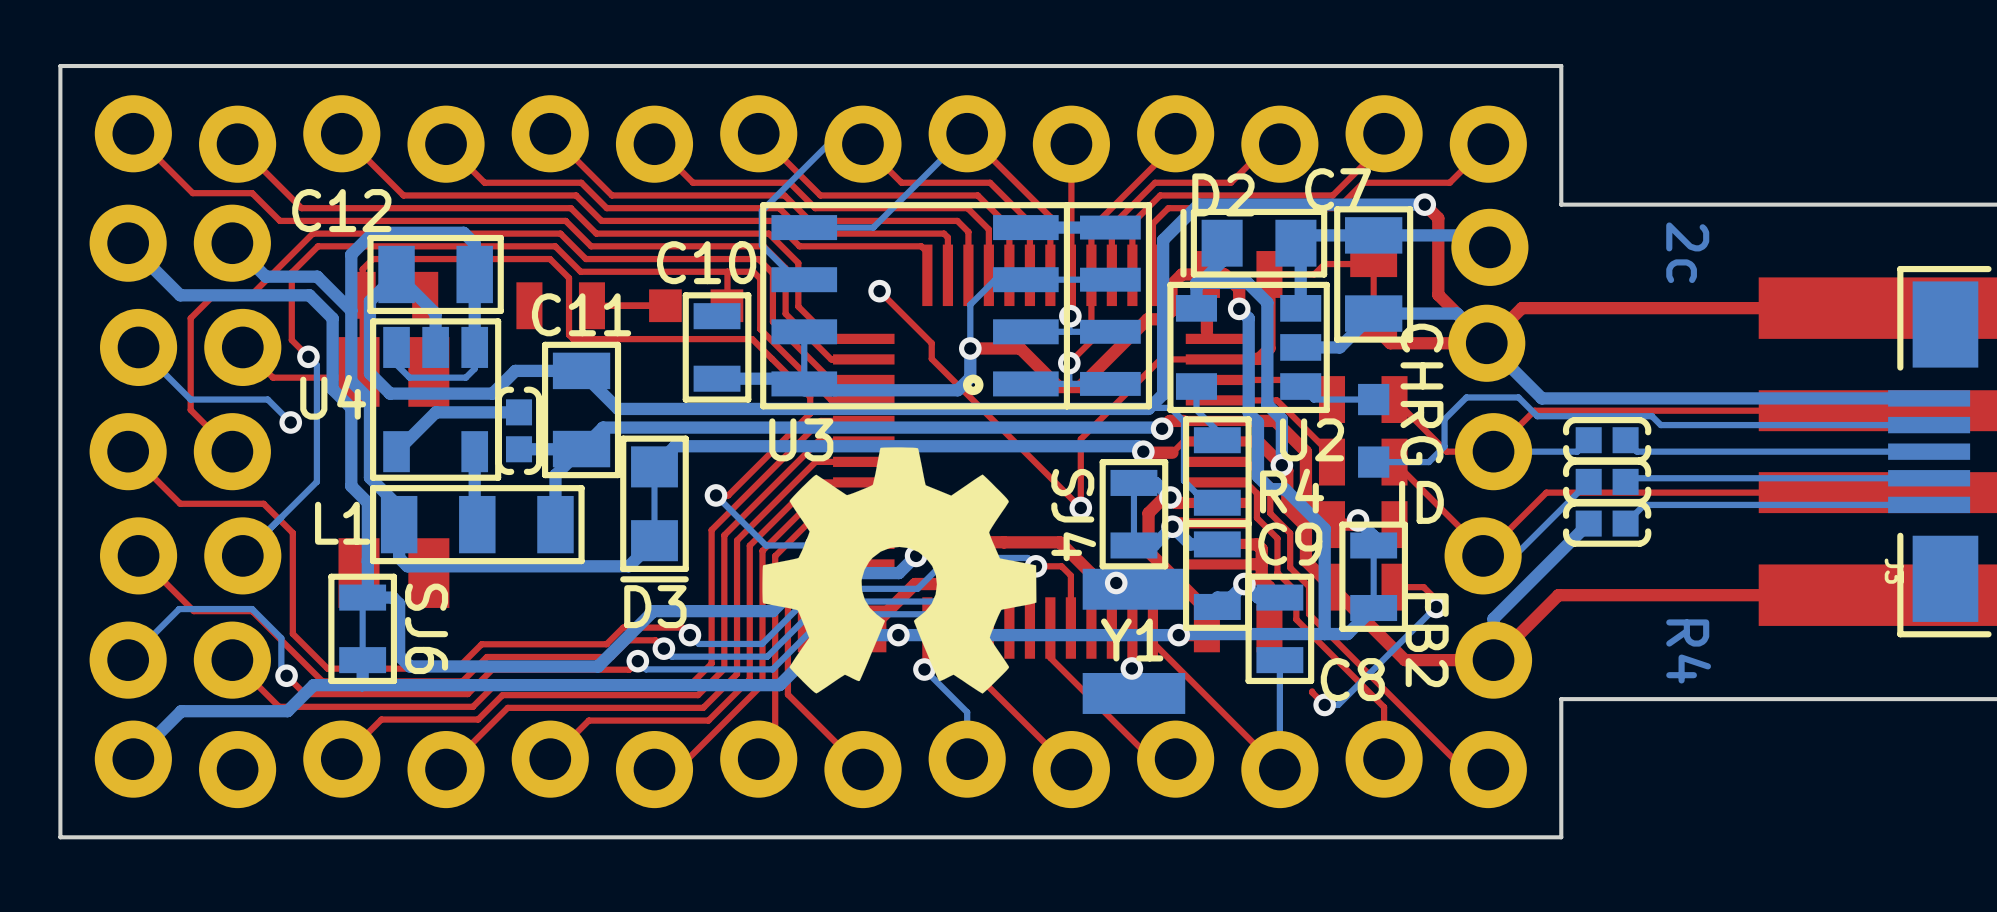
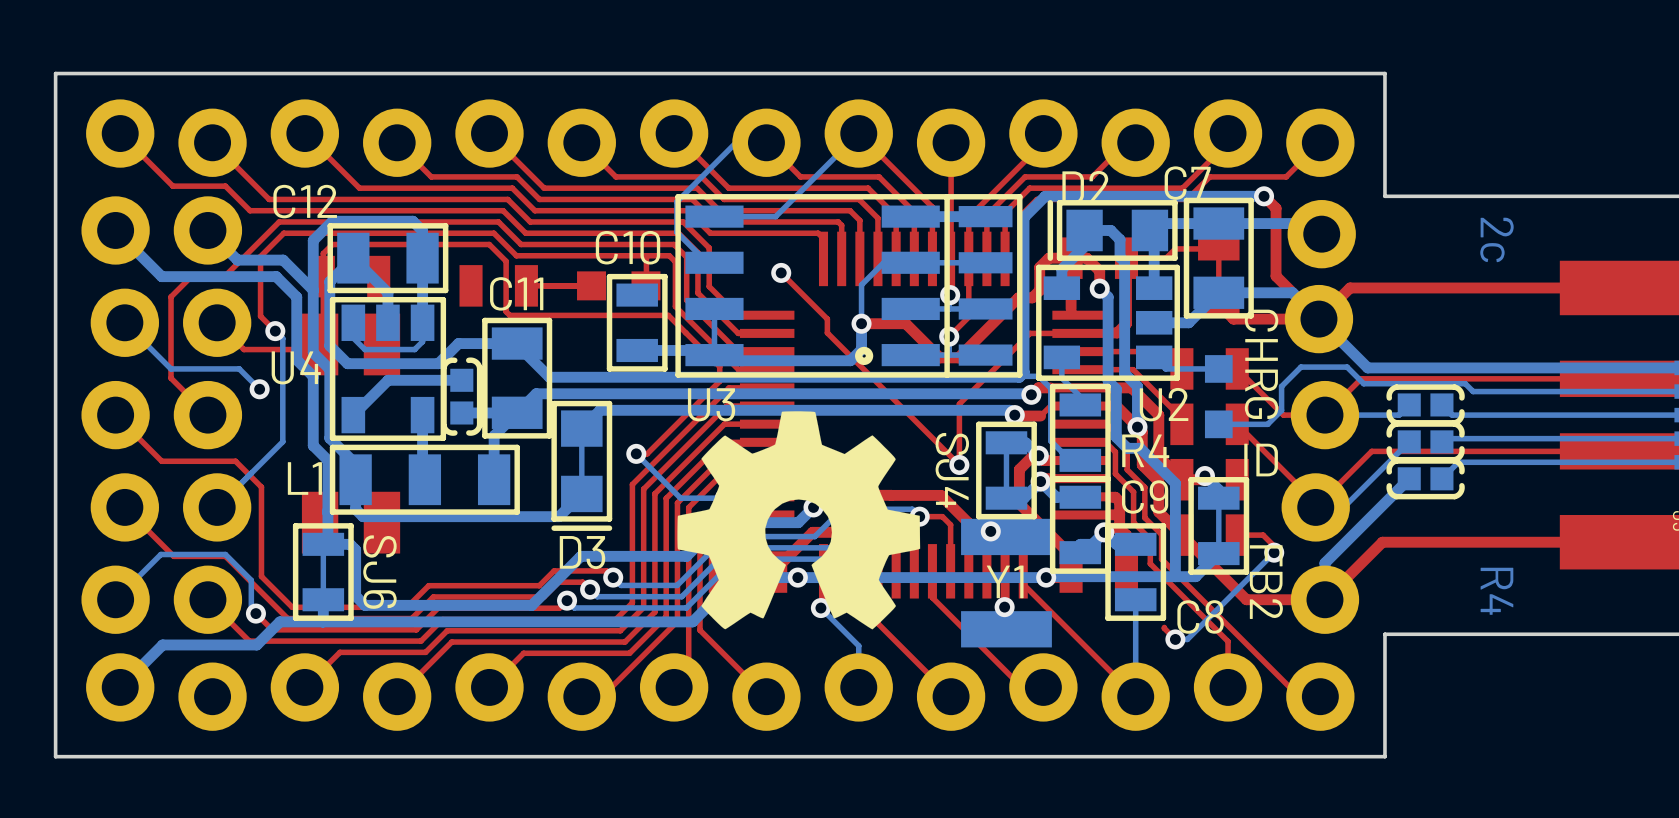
bottom track: (1198, 204) (1163, 240) (1163, 394) (1153, 403) -> (1063, 196) (1045, 196) (1024, 217) (1024, 372)
bottom track: (1196, 286) (1196, 282) (1247, 282) (1267, 302) -> (1084, 230) (1110, 230) (1120, 239) (1120, 257) (1124, 261) (1124, 283)

